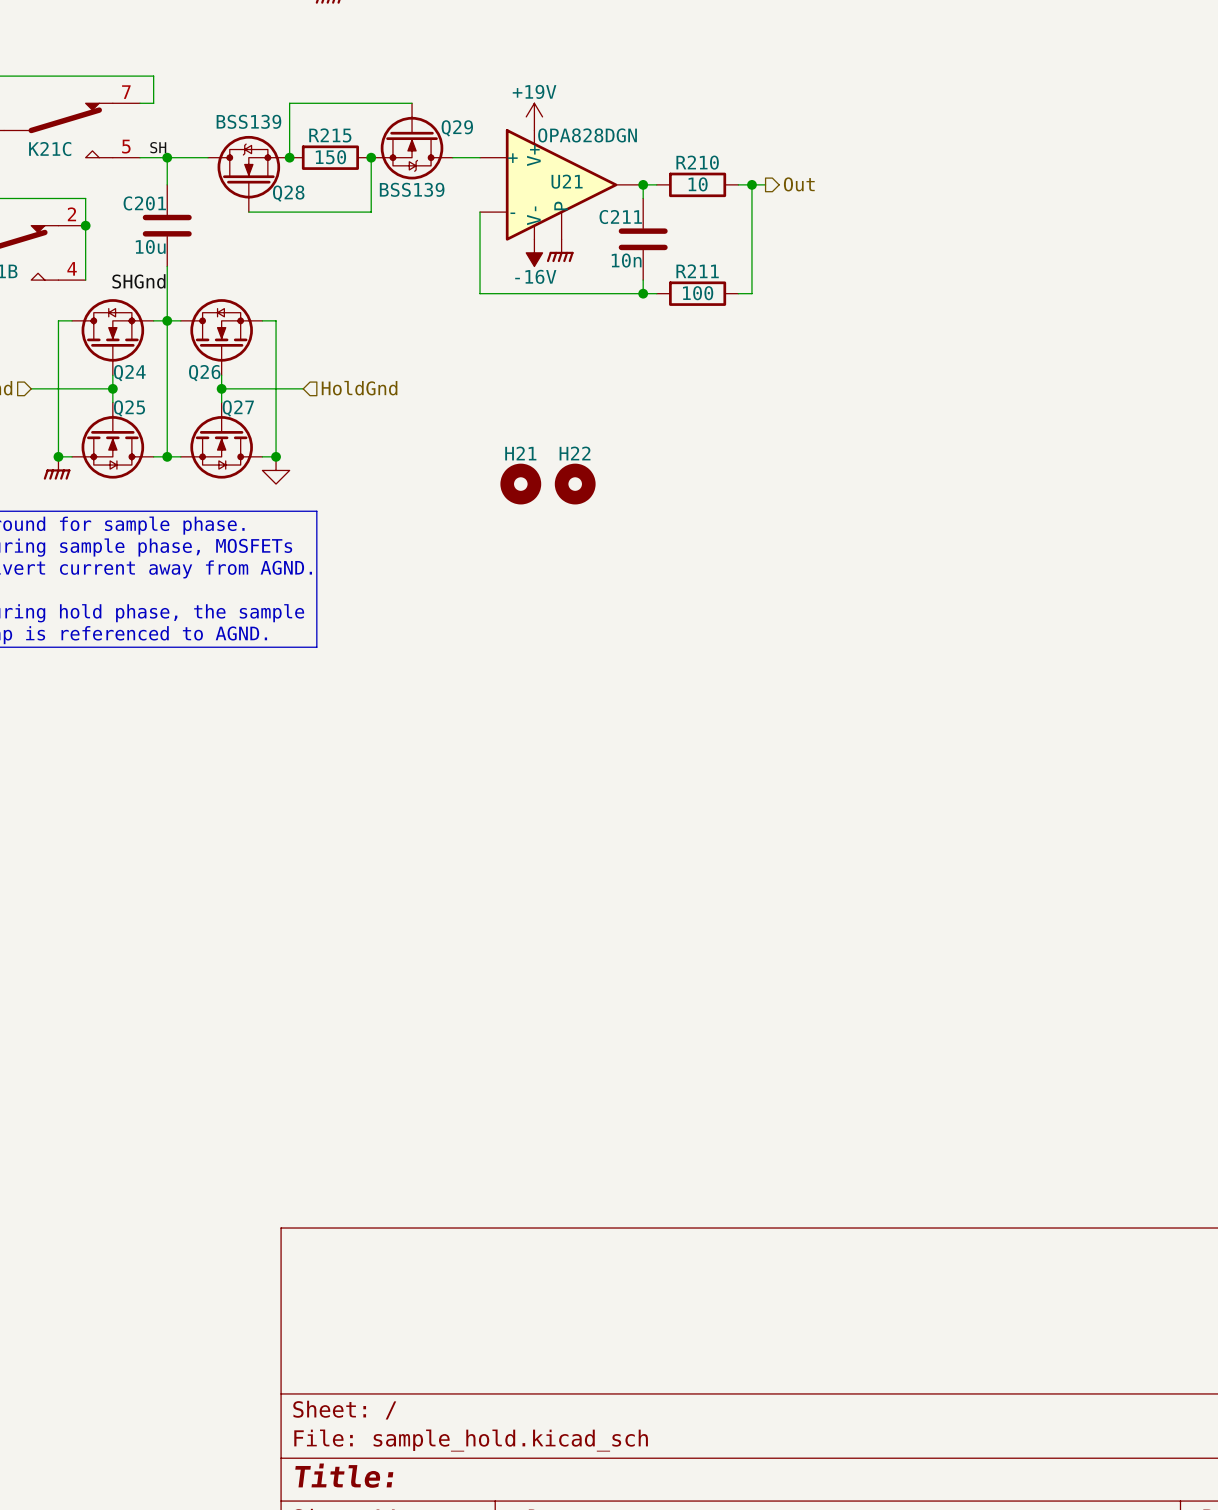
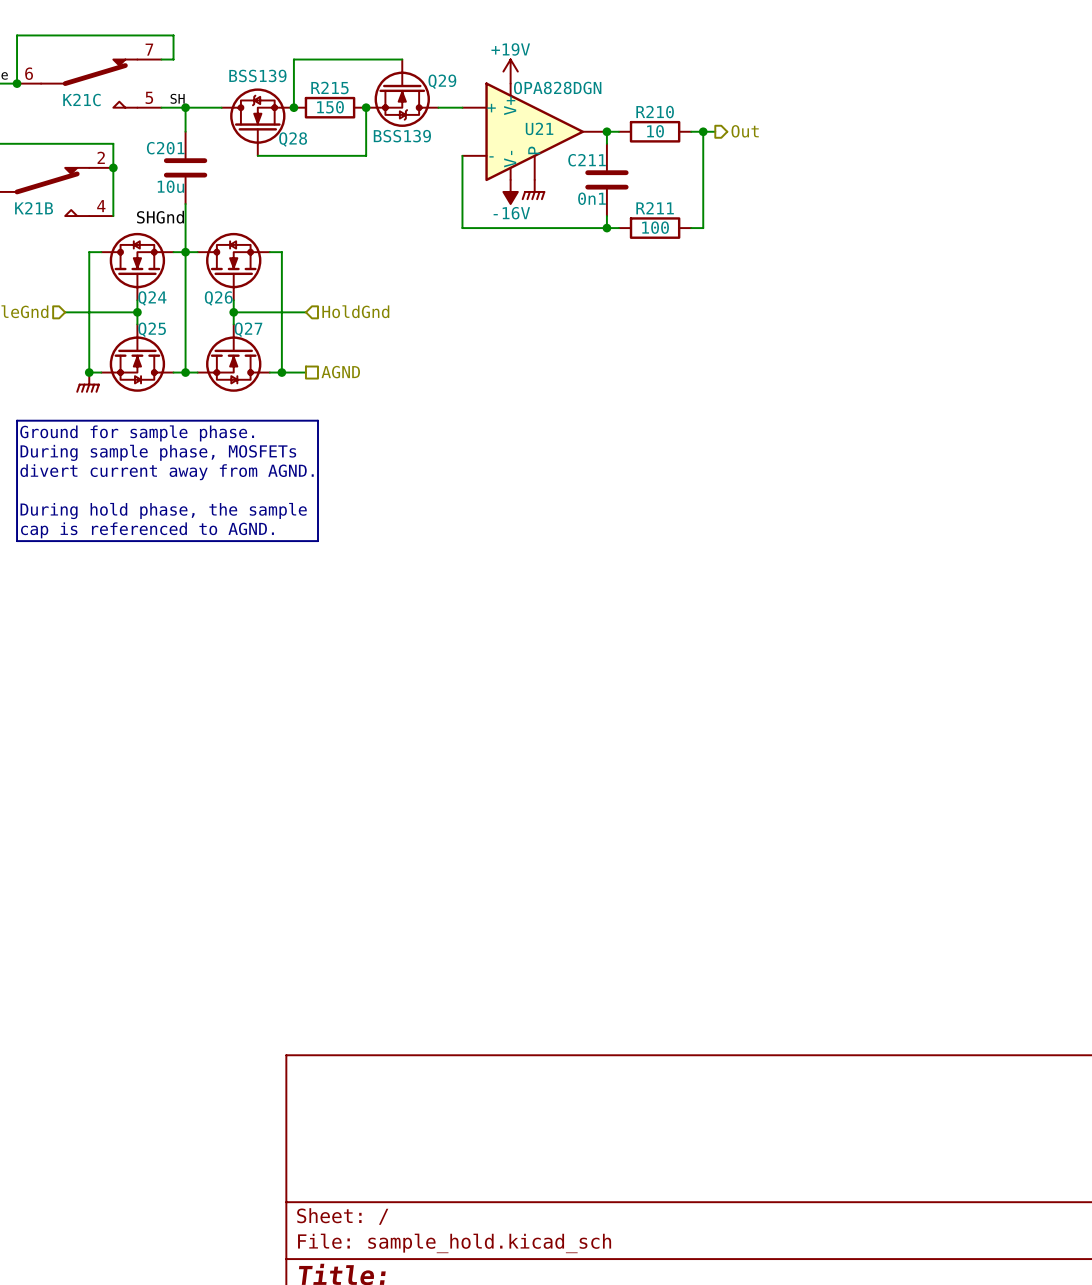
C211 value: 10n (626, 260) -> 0n1 (591, 198)
wire: none -> (281, 372) (305, 372)
hierarchical label: none -> AGND (340, 372)
power symbol: (276, 470) -> none
H21: (520, 484) -> none
H22: (575, 484) -> none

